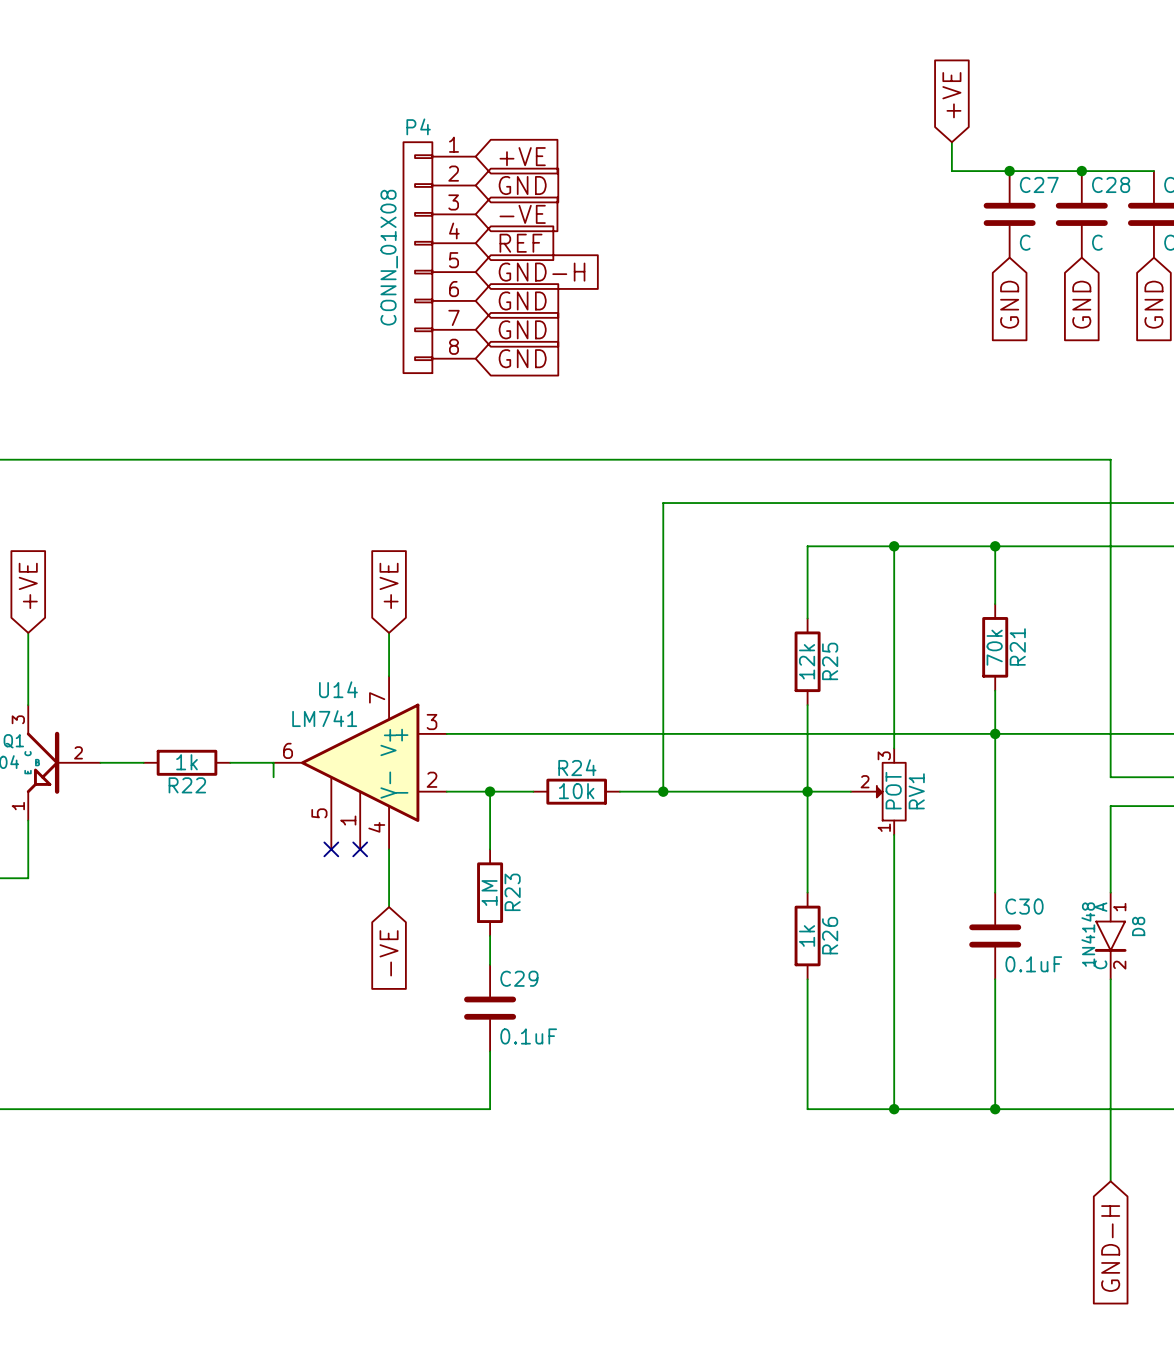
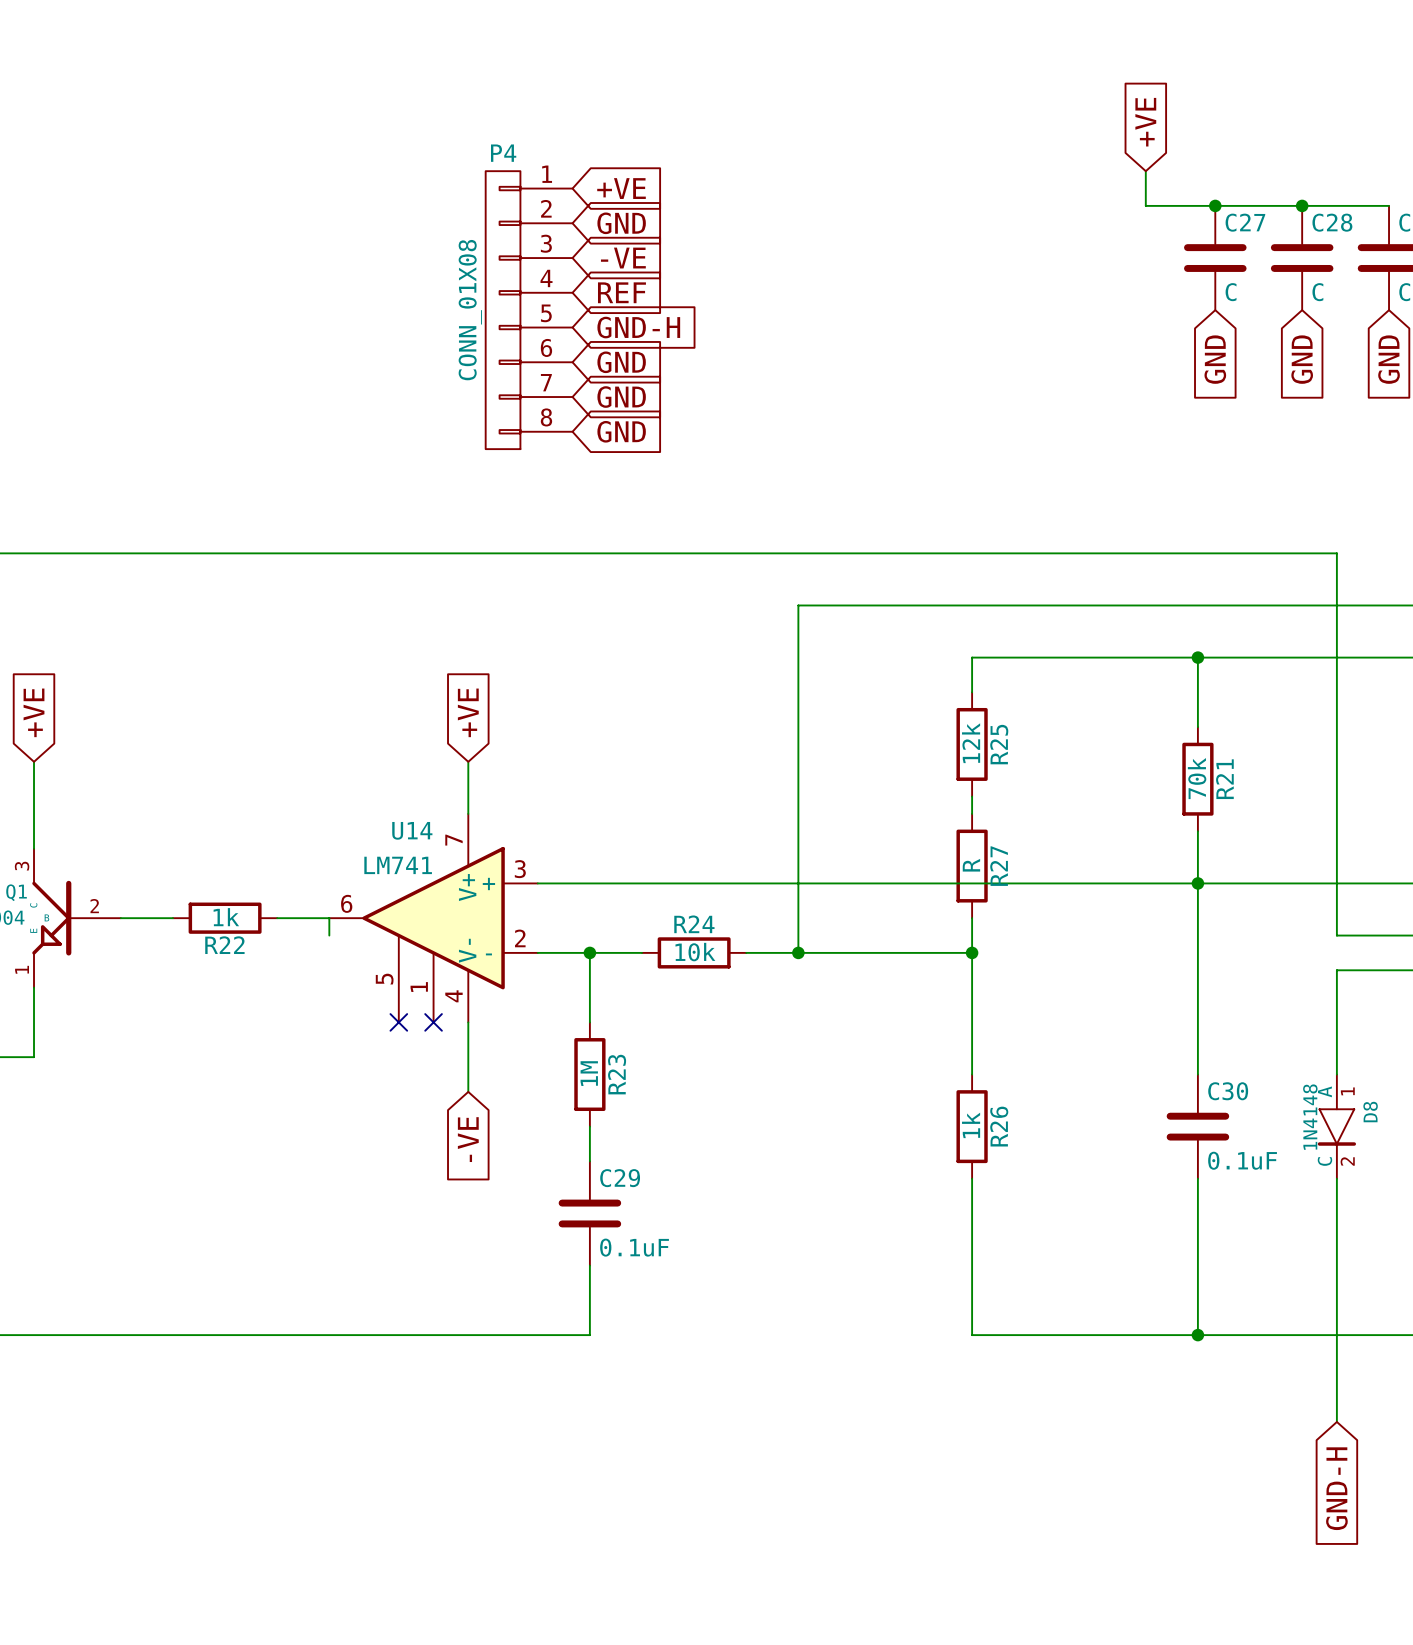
wire: (894, 546) (894, 748) -> none
junction: (894, 546) -> none
wire: (807, 575) (807, 618) -> none
wire: none -> (972, 796) (972, 813)
R25 position: (807, 661) -> (972, 744)
wire: (807, 705) (807, 762) -> none
R27: none -> R (972, 866)
wire: (807, 791) (850, 791) -> none
RV1: POT (878, 791) -> none
wire: (894, 834) (894, 1109) -> none
junction: (894, 1109) -> none

